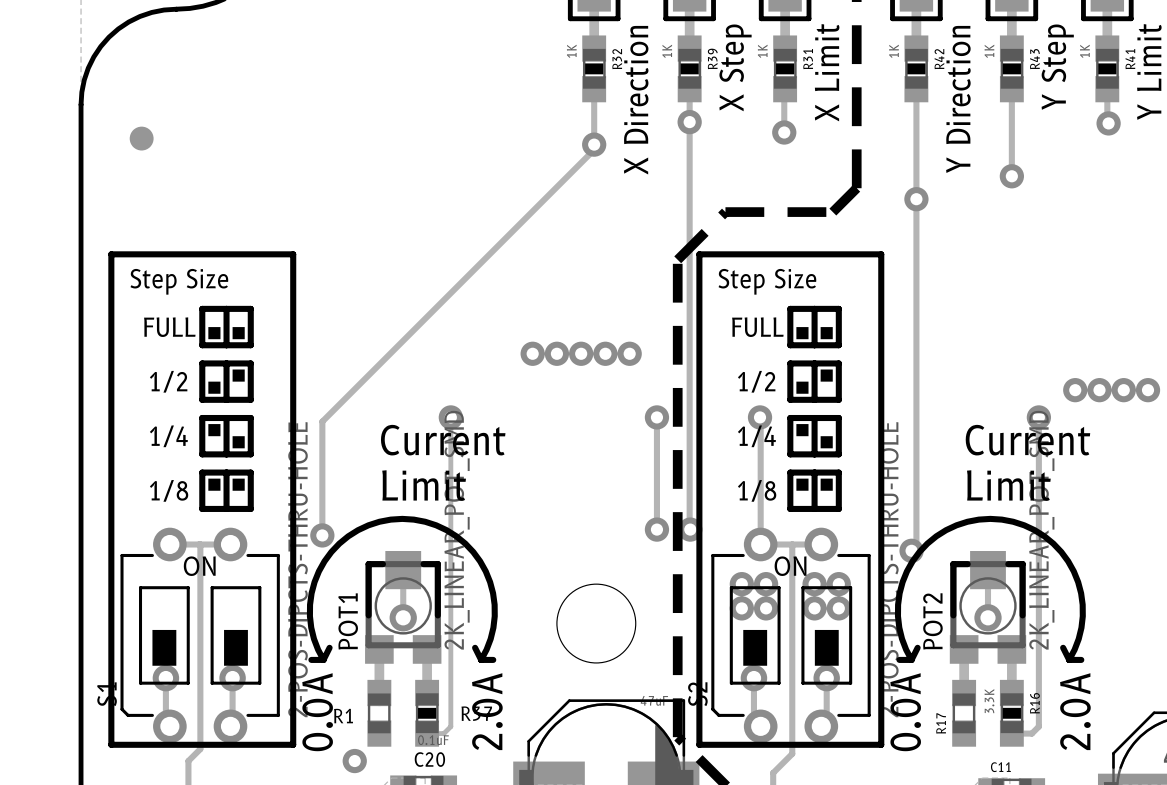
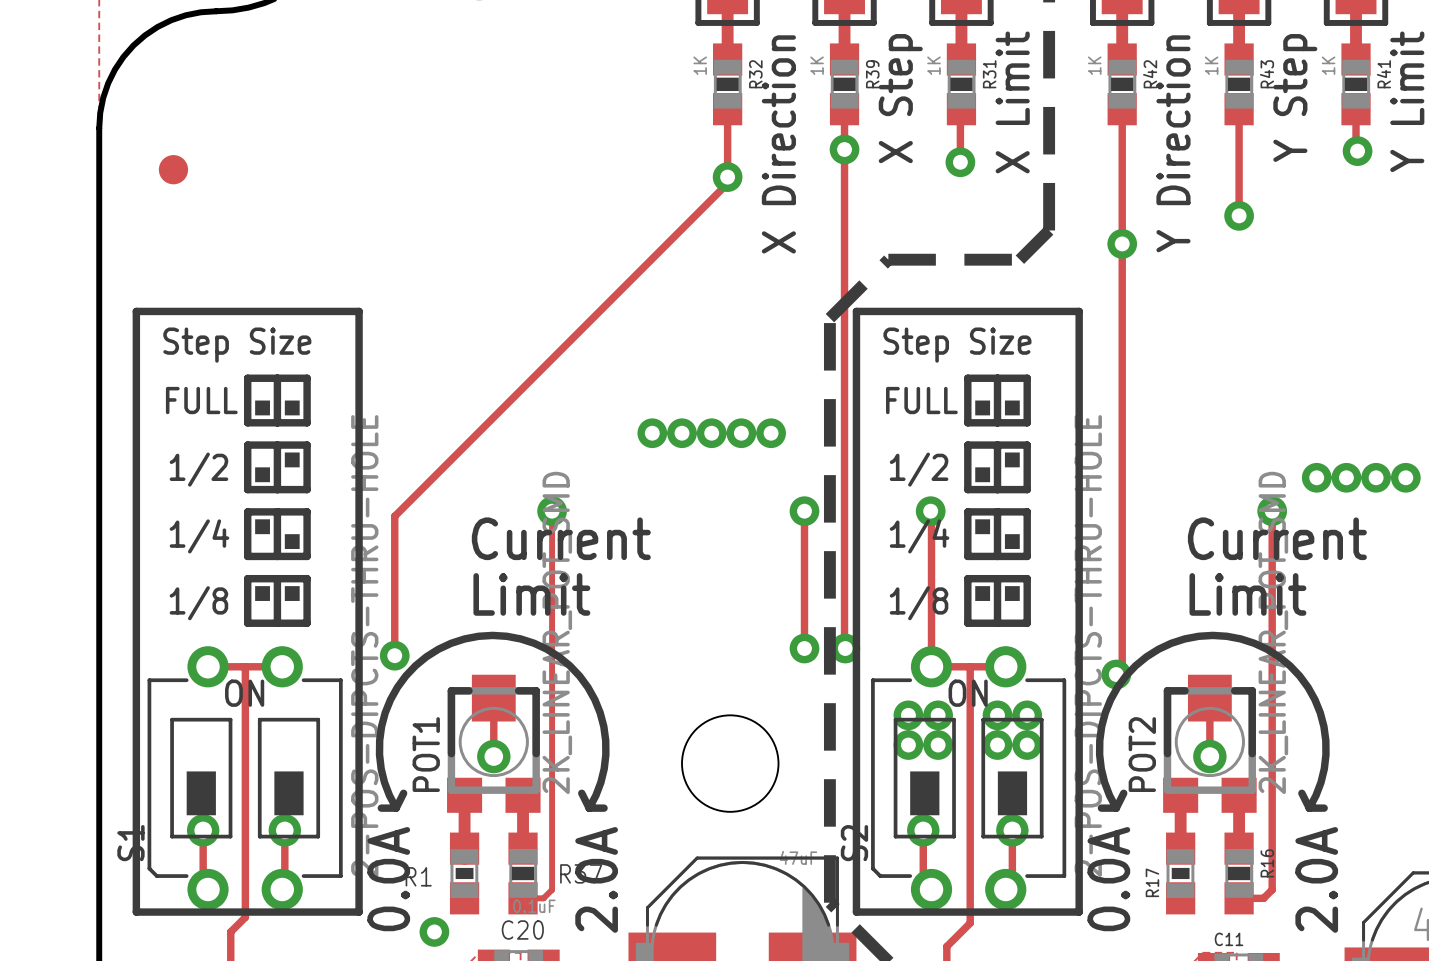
R1 footprint: [367, 679, 392, 747] -> [449, 832, 480, 915]
R17 footprint: [952, 679, 977, 747] -> [1166, 832, 1196, 915]
R16 value: 3.3K (989, 701) -> none

